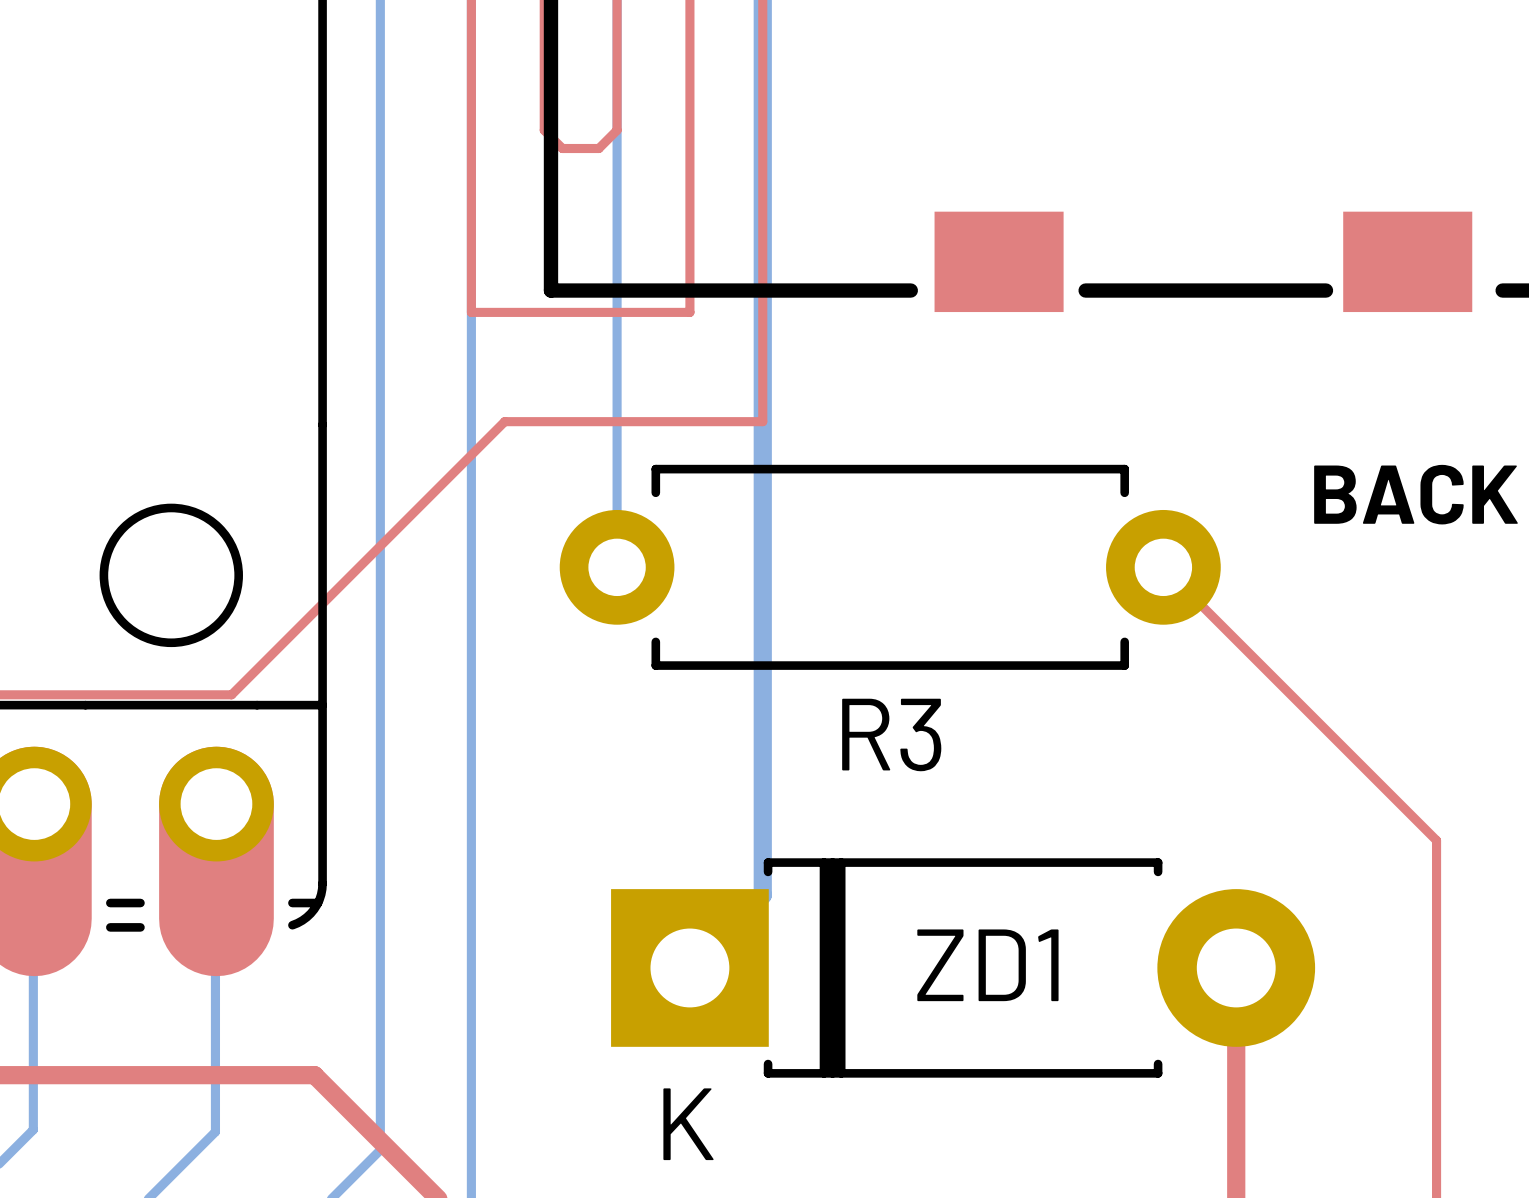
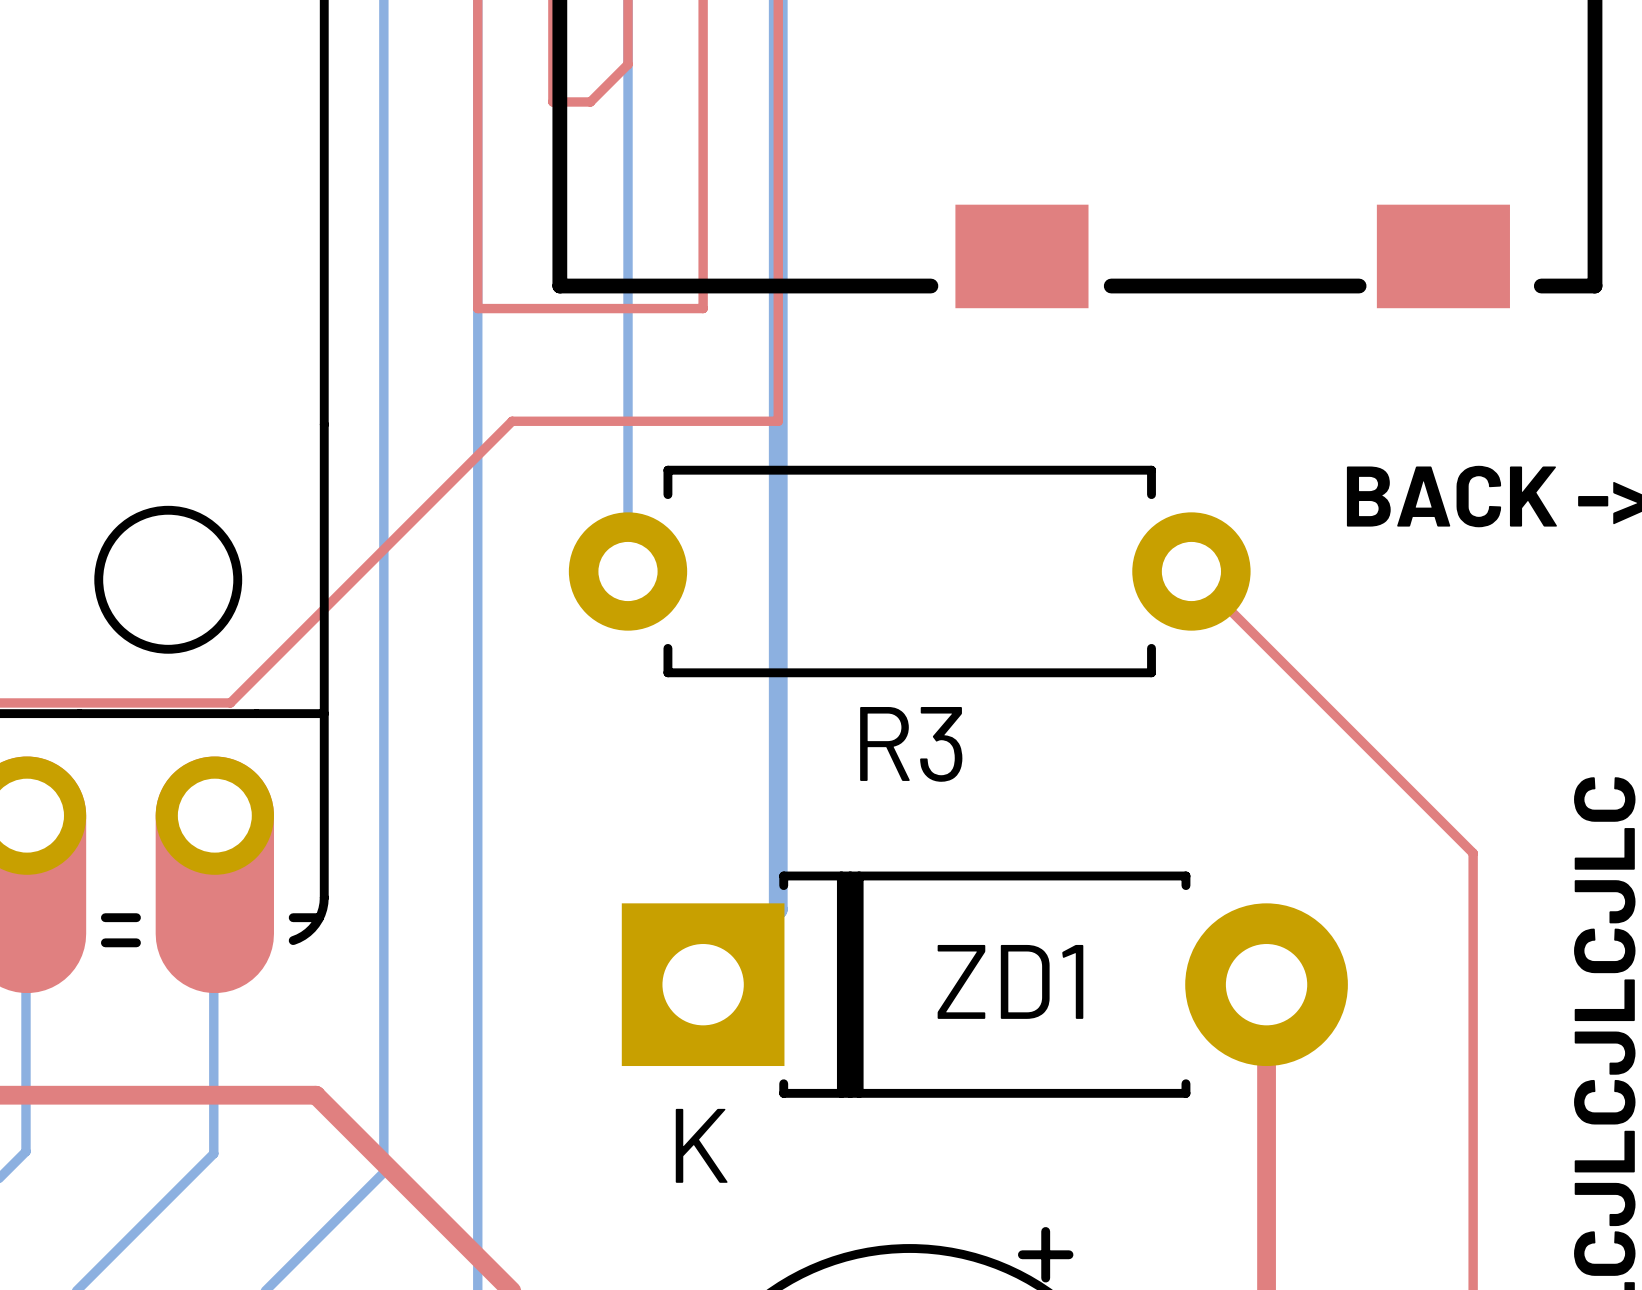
top track: (617, 75) (617, 130) (598, 148) (562, 148) (544, 130) (544, 112) -> (628, 64) (590, 101) (552, 101)

